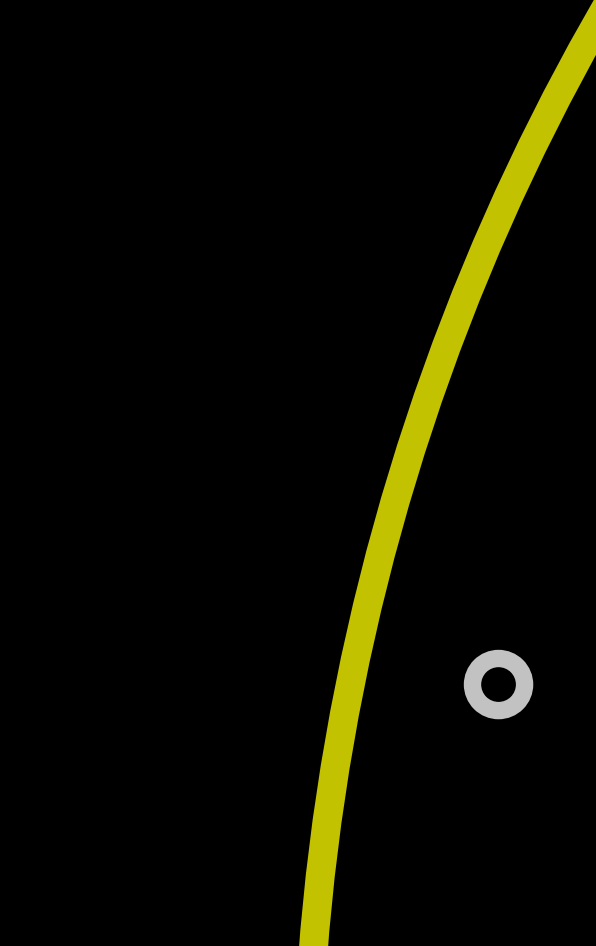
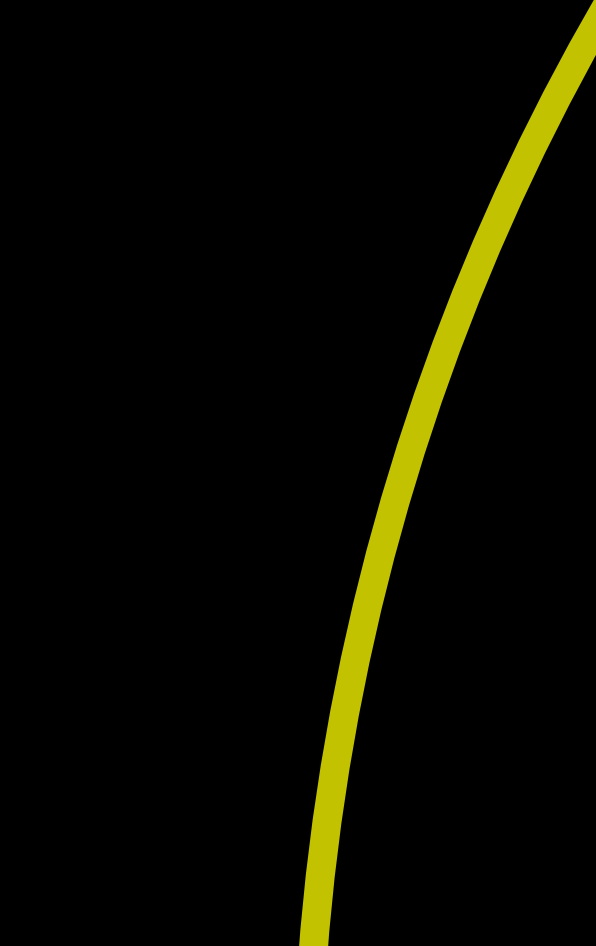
via: (498, 684) -> none

